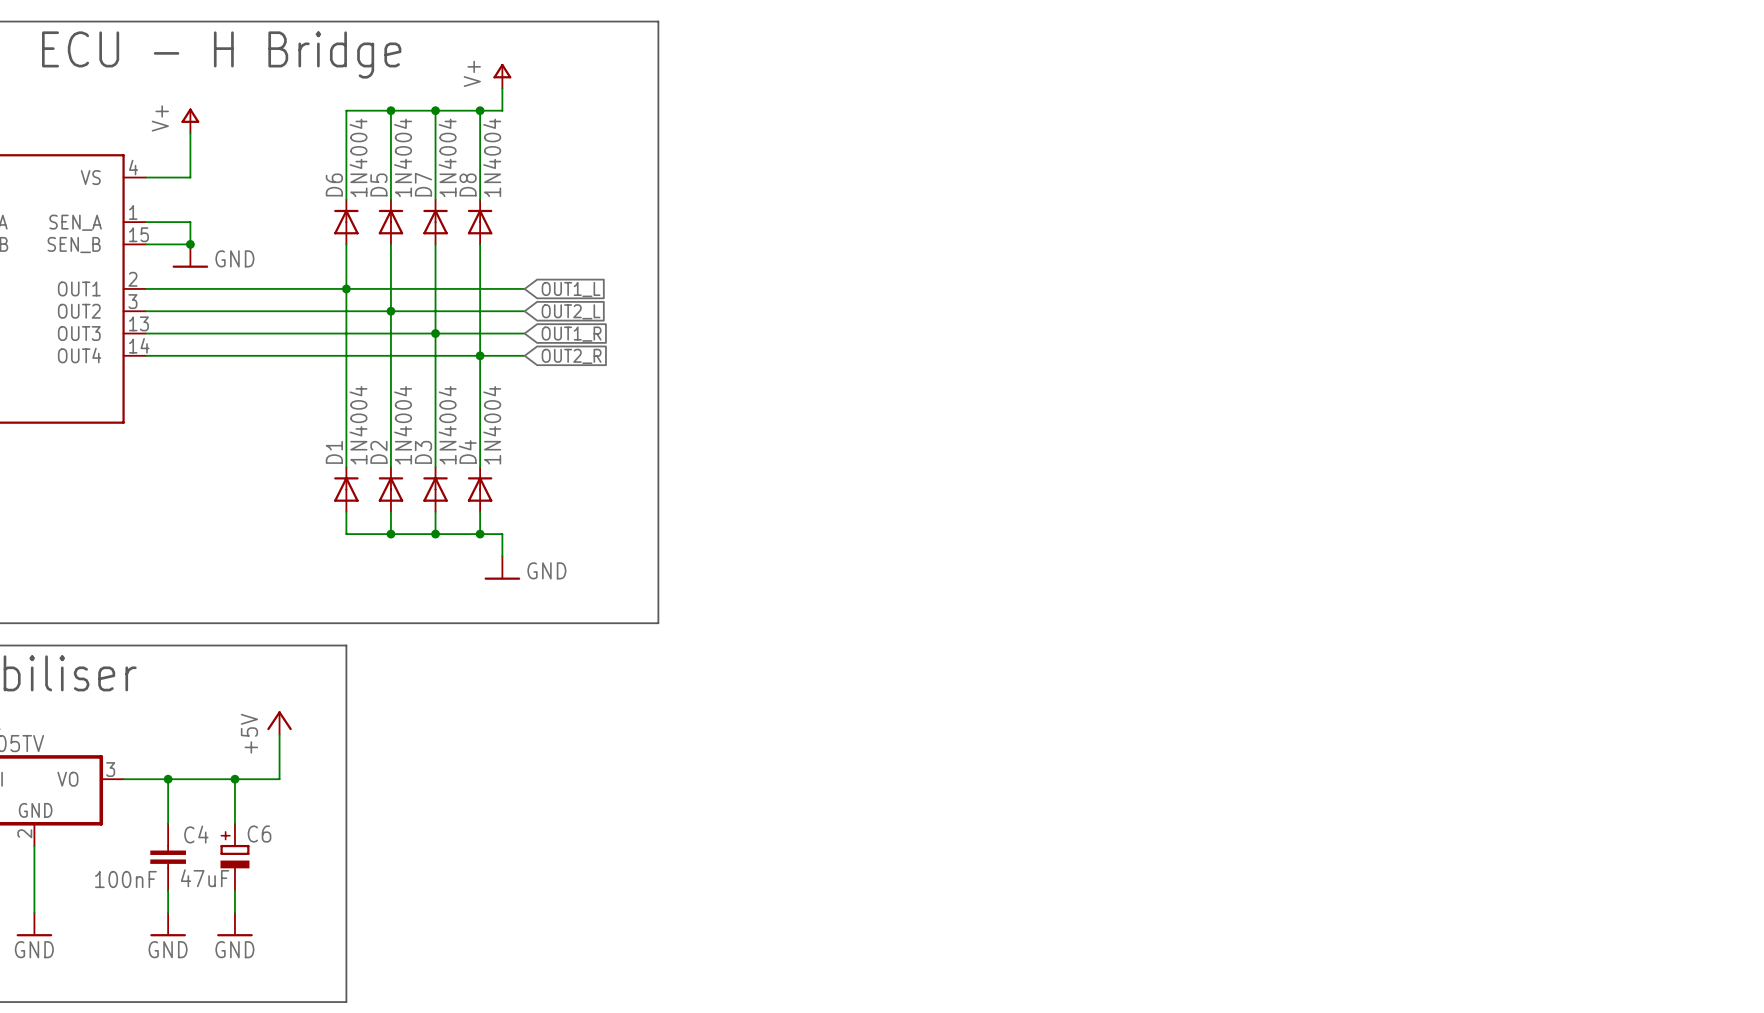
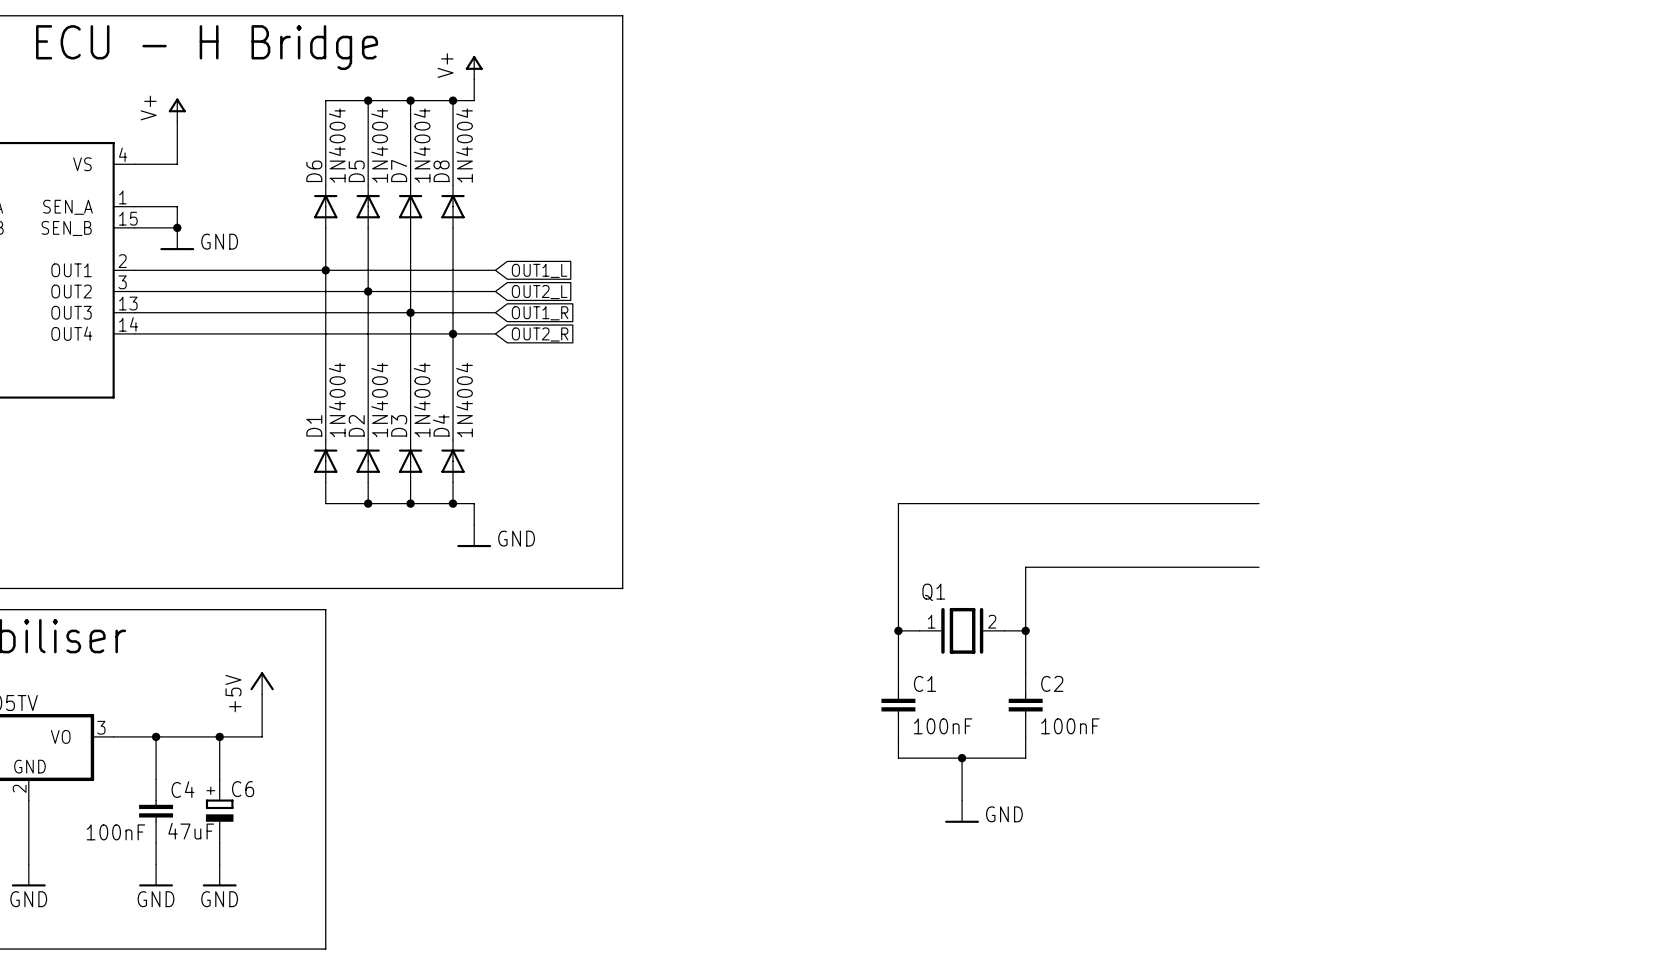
wire: none -> (1259, 503) (898, 503) (898, 673)
wire: none -> (1259, 567) (1025, 567) (1025, 673)
wire: none -> (898, 630) (919, 630)
junction: none -> (898, 630)
Q1: none -> (962, 630)
wire: none -> (1004, 630) (1025, 630)
junction: none -> (1025, 630)
C1: none -> 100nF (898, 705)
C2: none -> 100nF (1025, 705)
wire: none -> (898, 736) (898, 758) (1025, 758) (1025, 736)
wire: none -> (962, 758) (962, 800)
junction: none -> (962, 758)
power symbol: none -> GND (962, 811)

